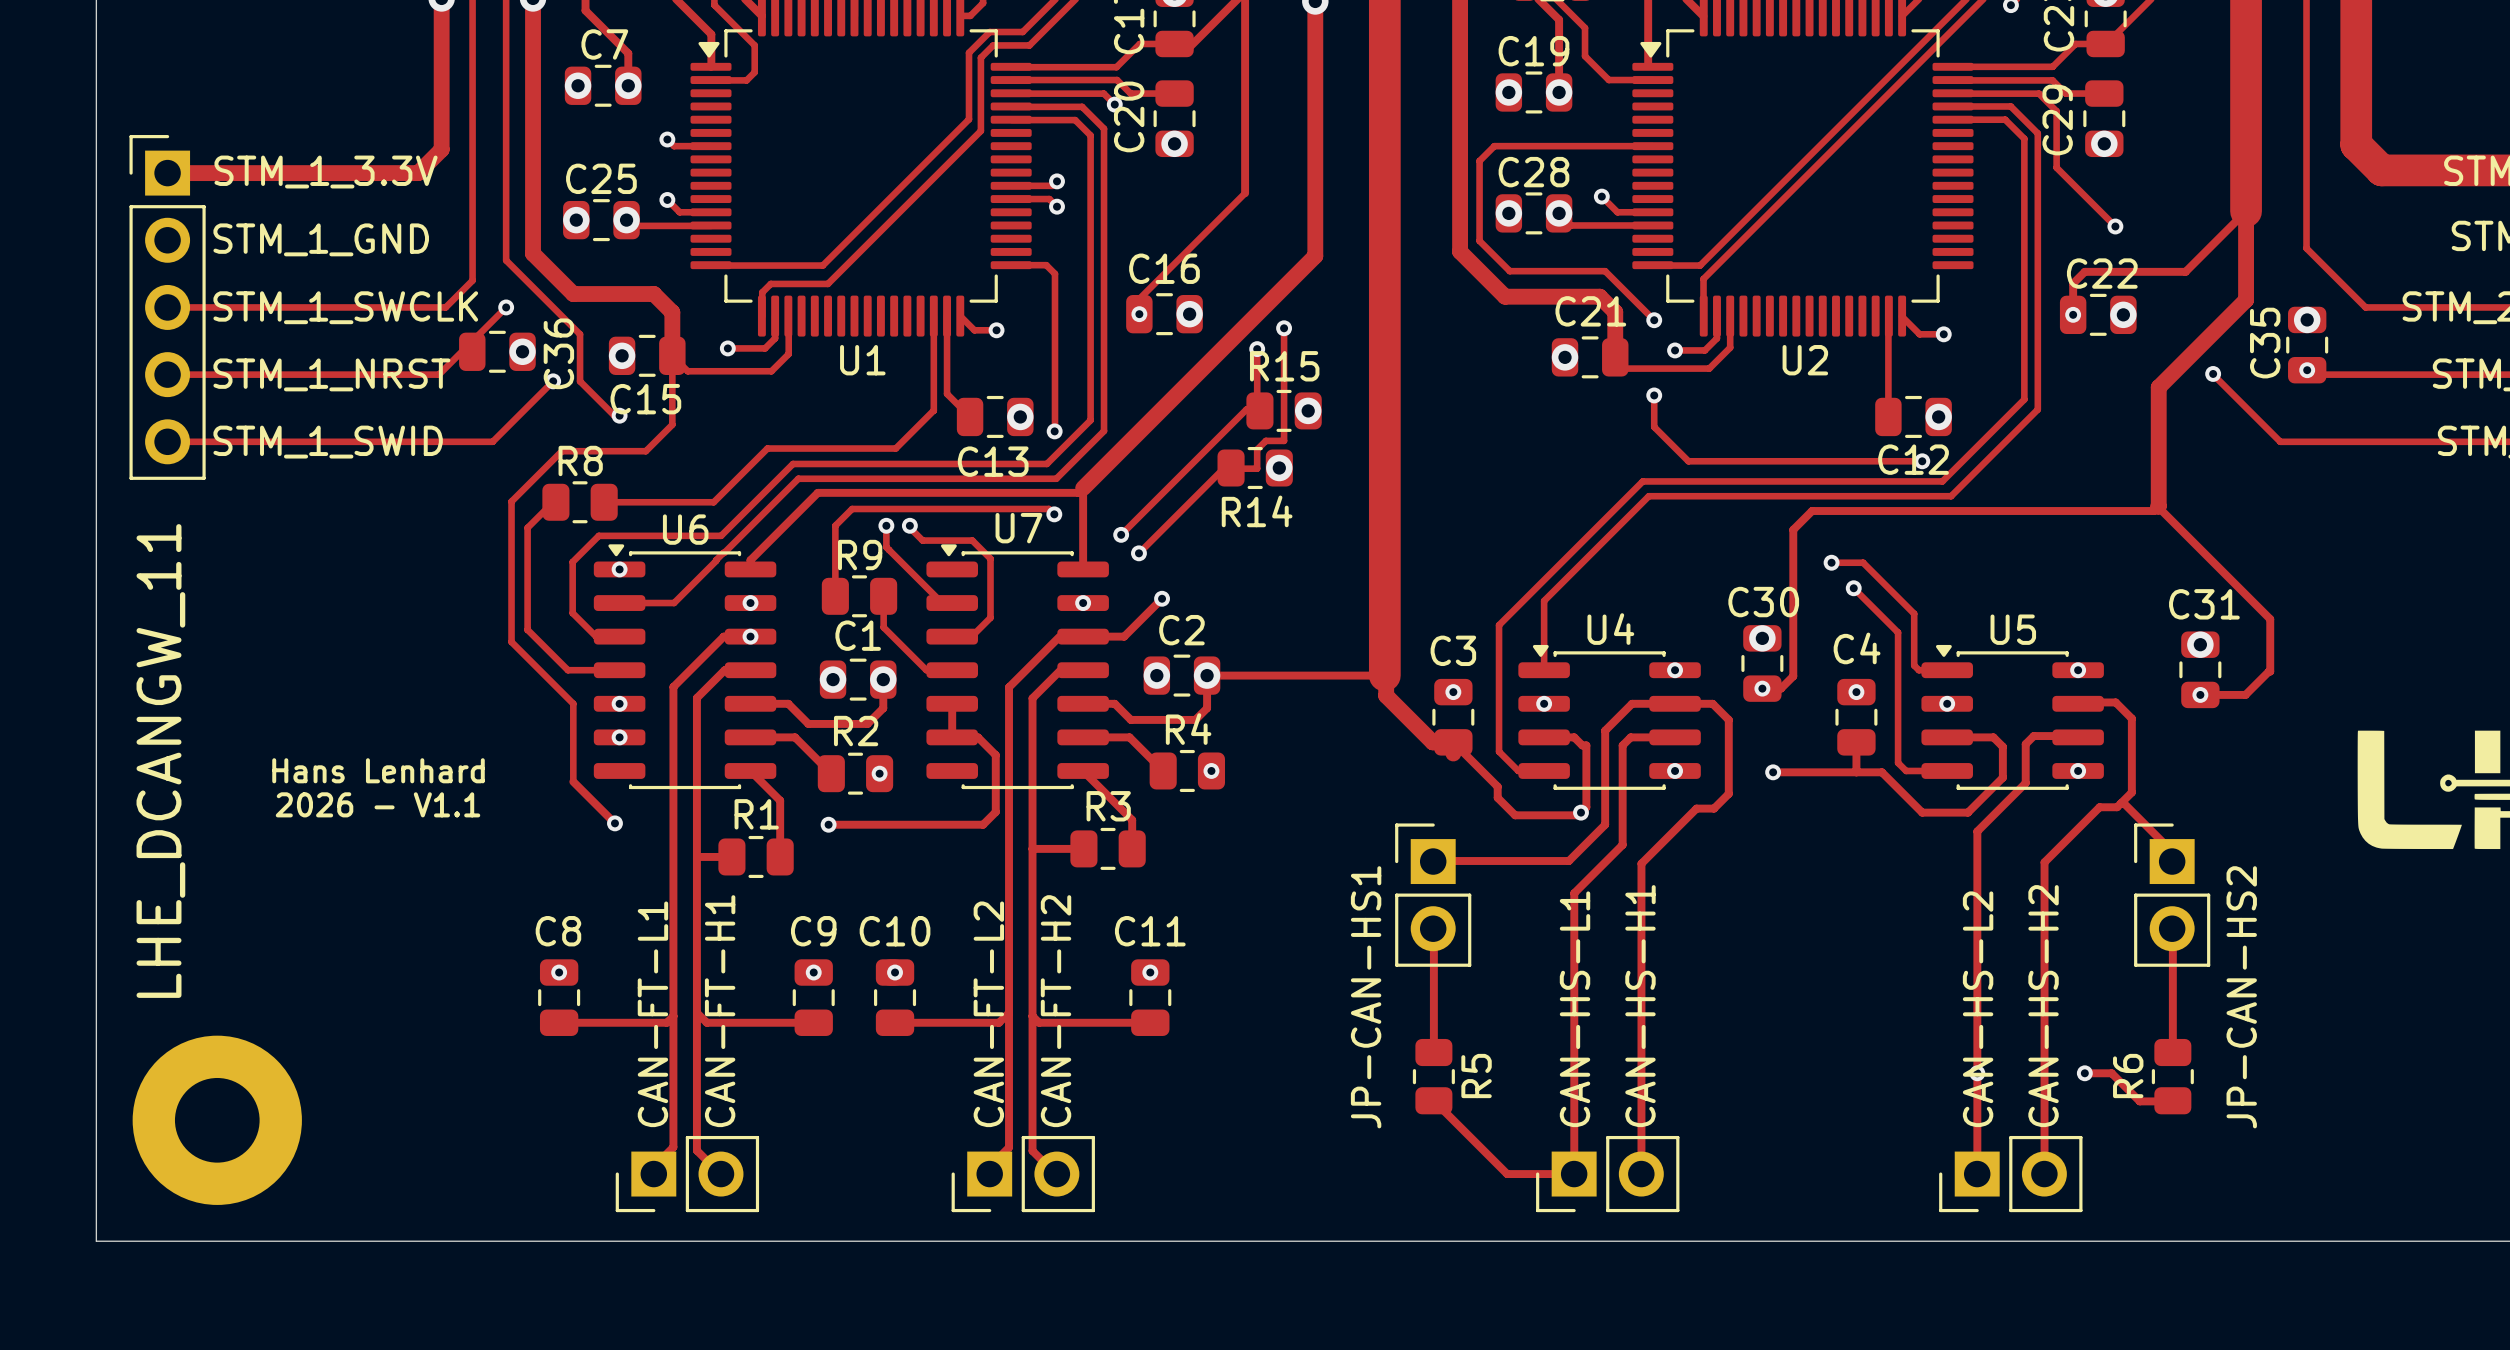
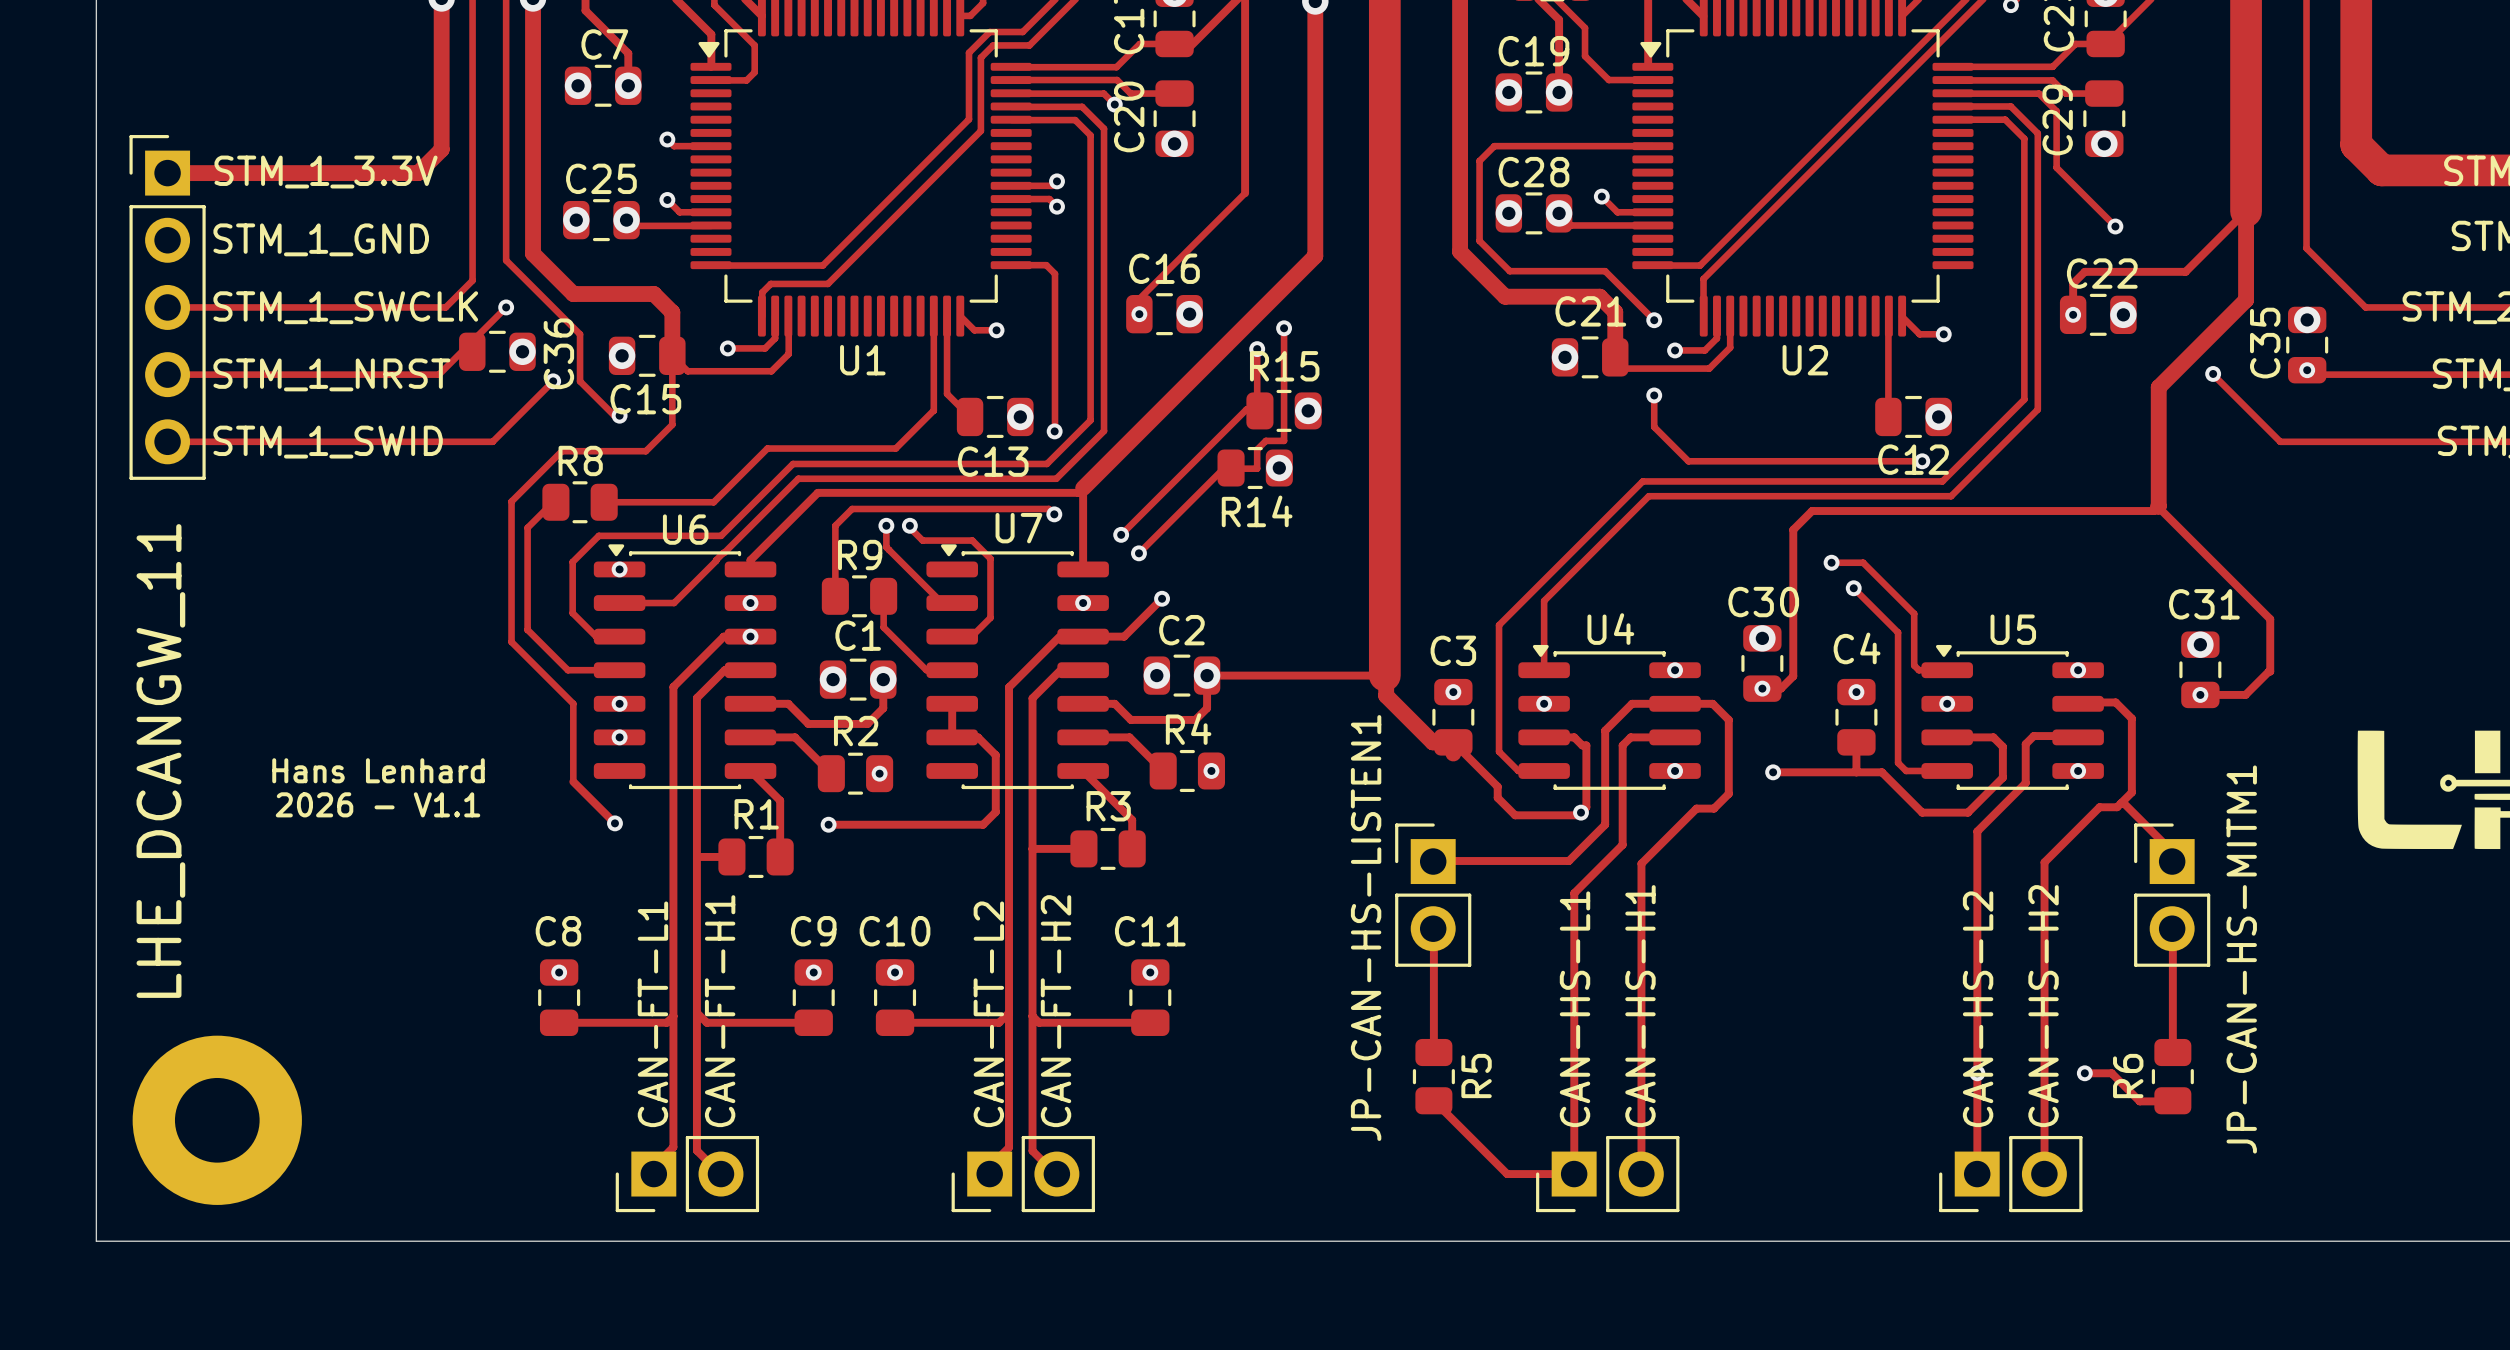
JP-CAN-HS1 name: JP-CAN-HS1 (1366, 997) -> JP-CAN-HS-LISTEN1 (1366, 928)
JP-CAN-HS2 name: JP-CAN-HS2 (2241, 997) -> JP-CAN-HS-MITM1 (2241, 959)

